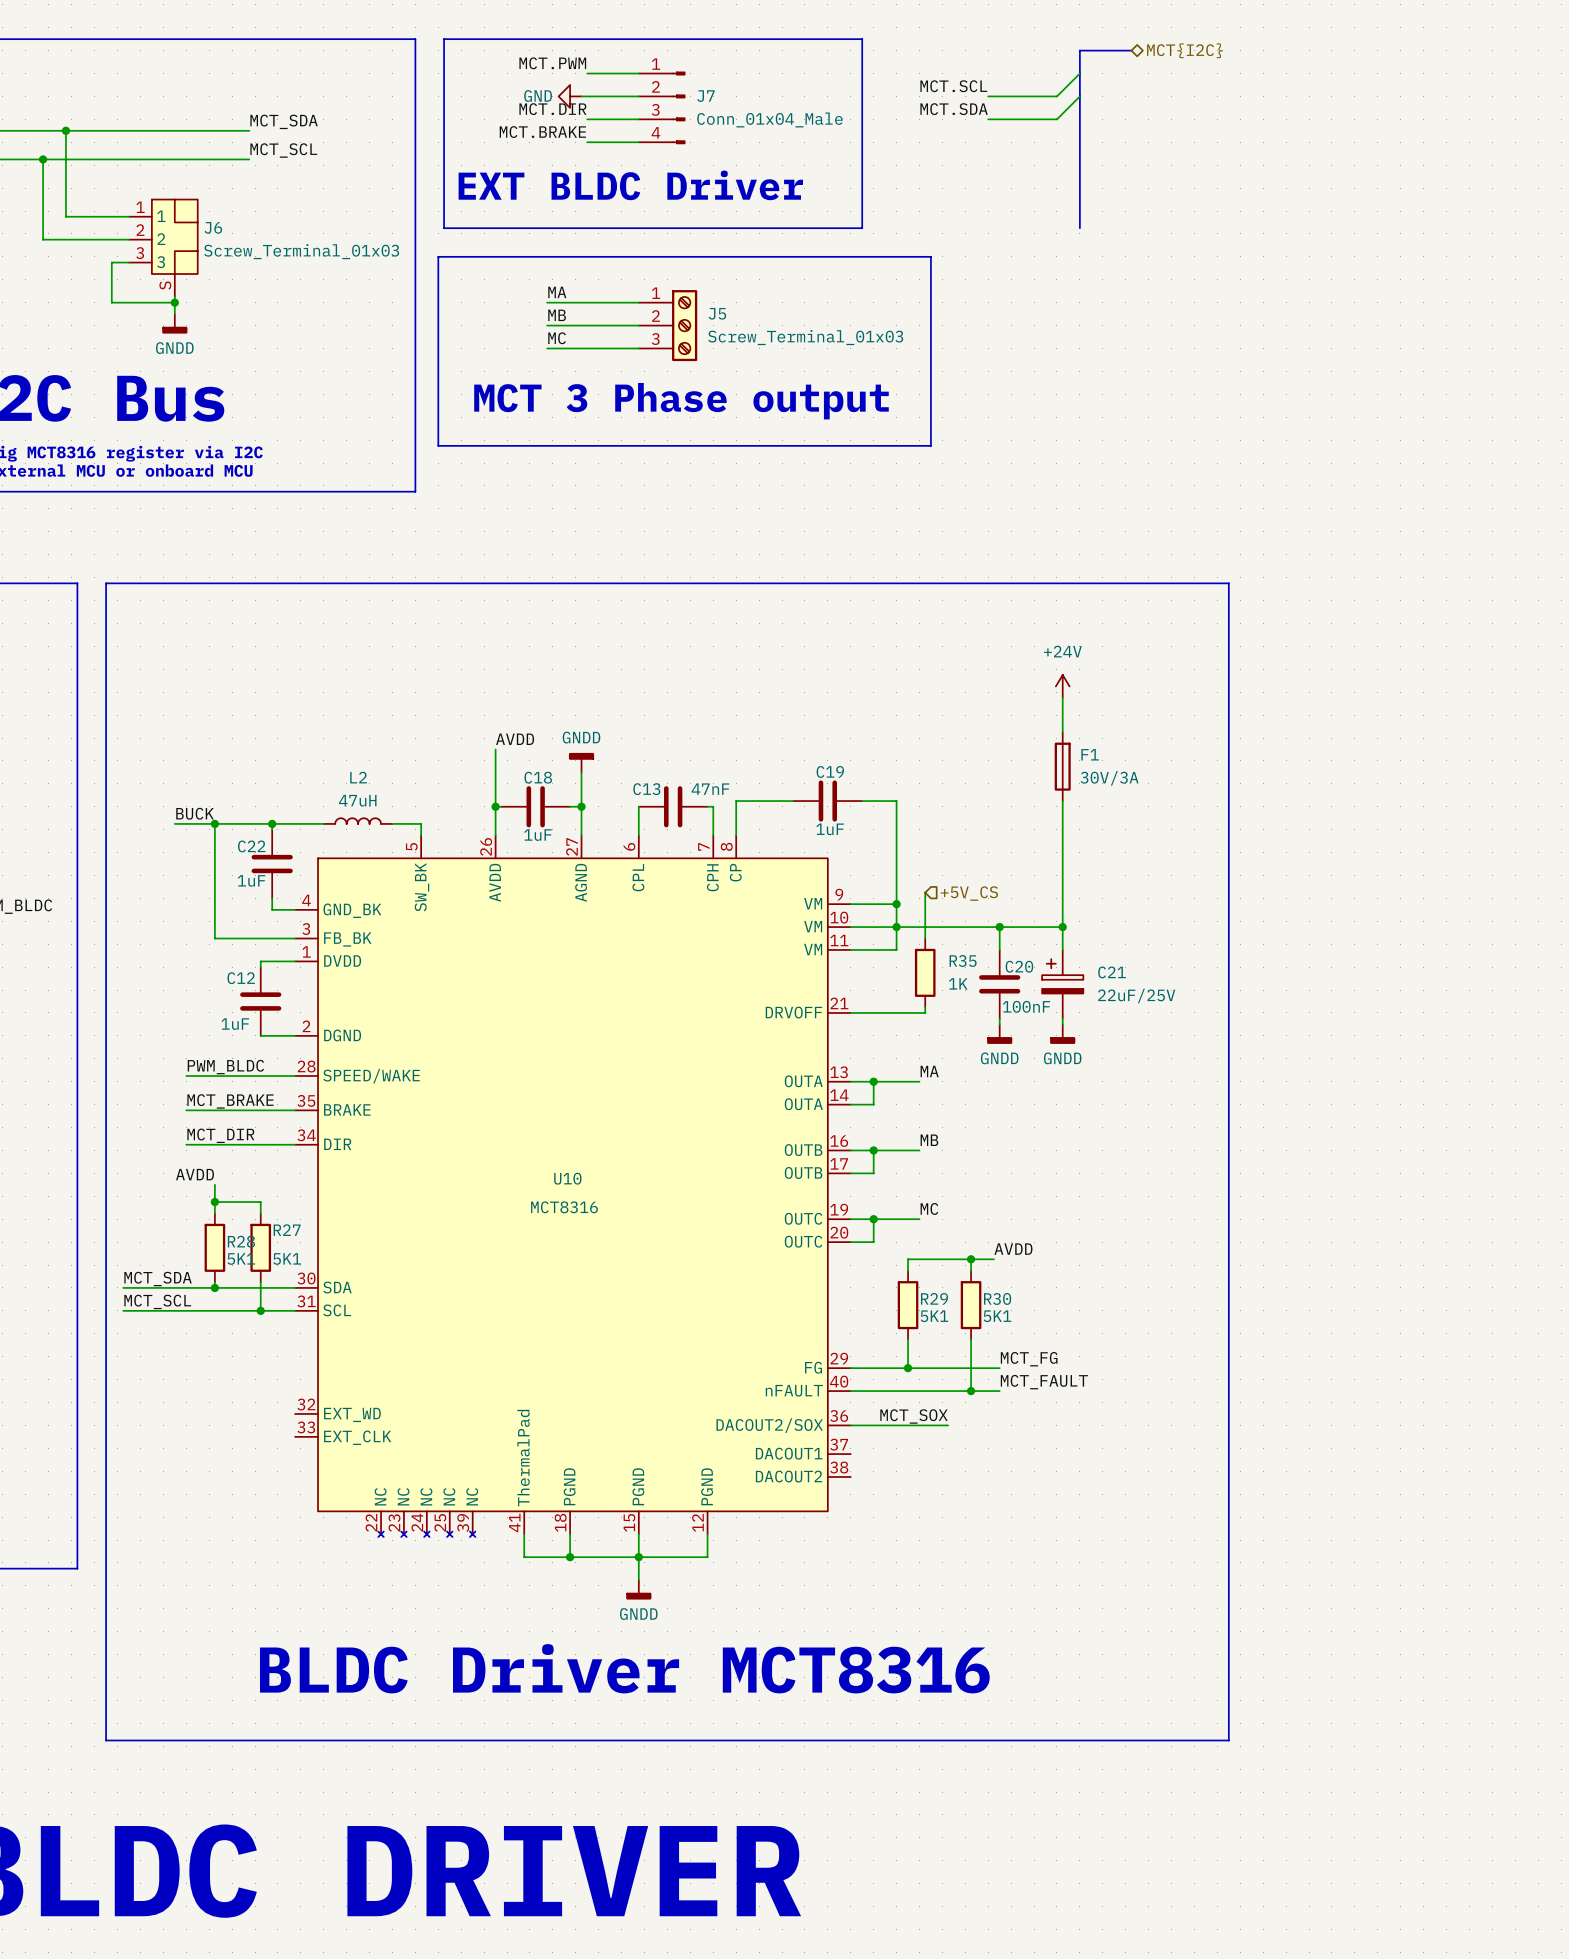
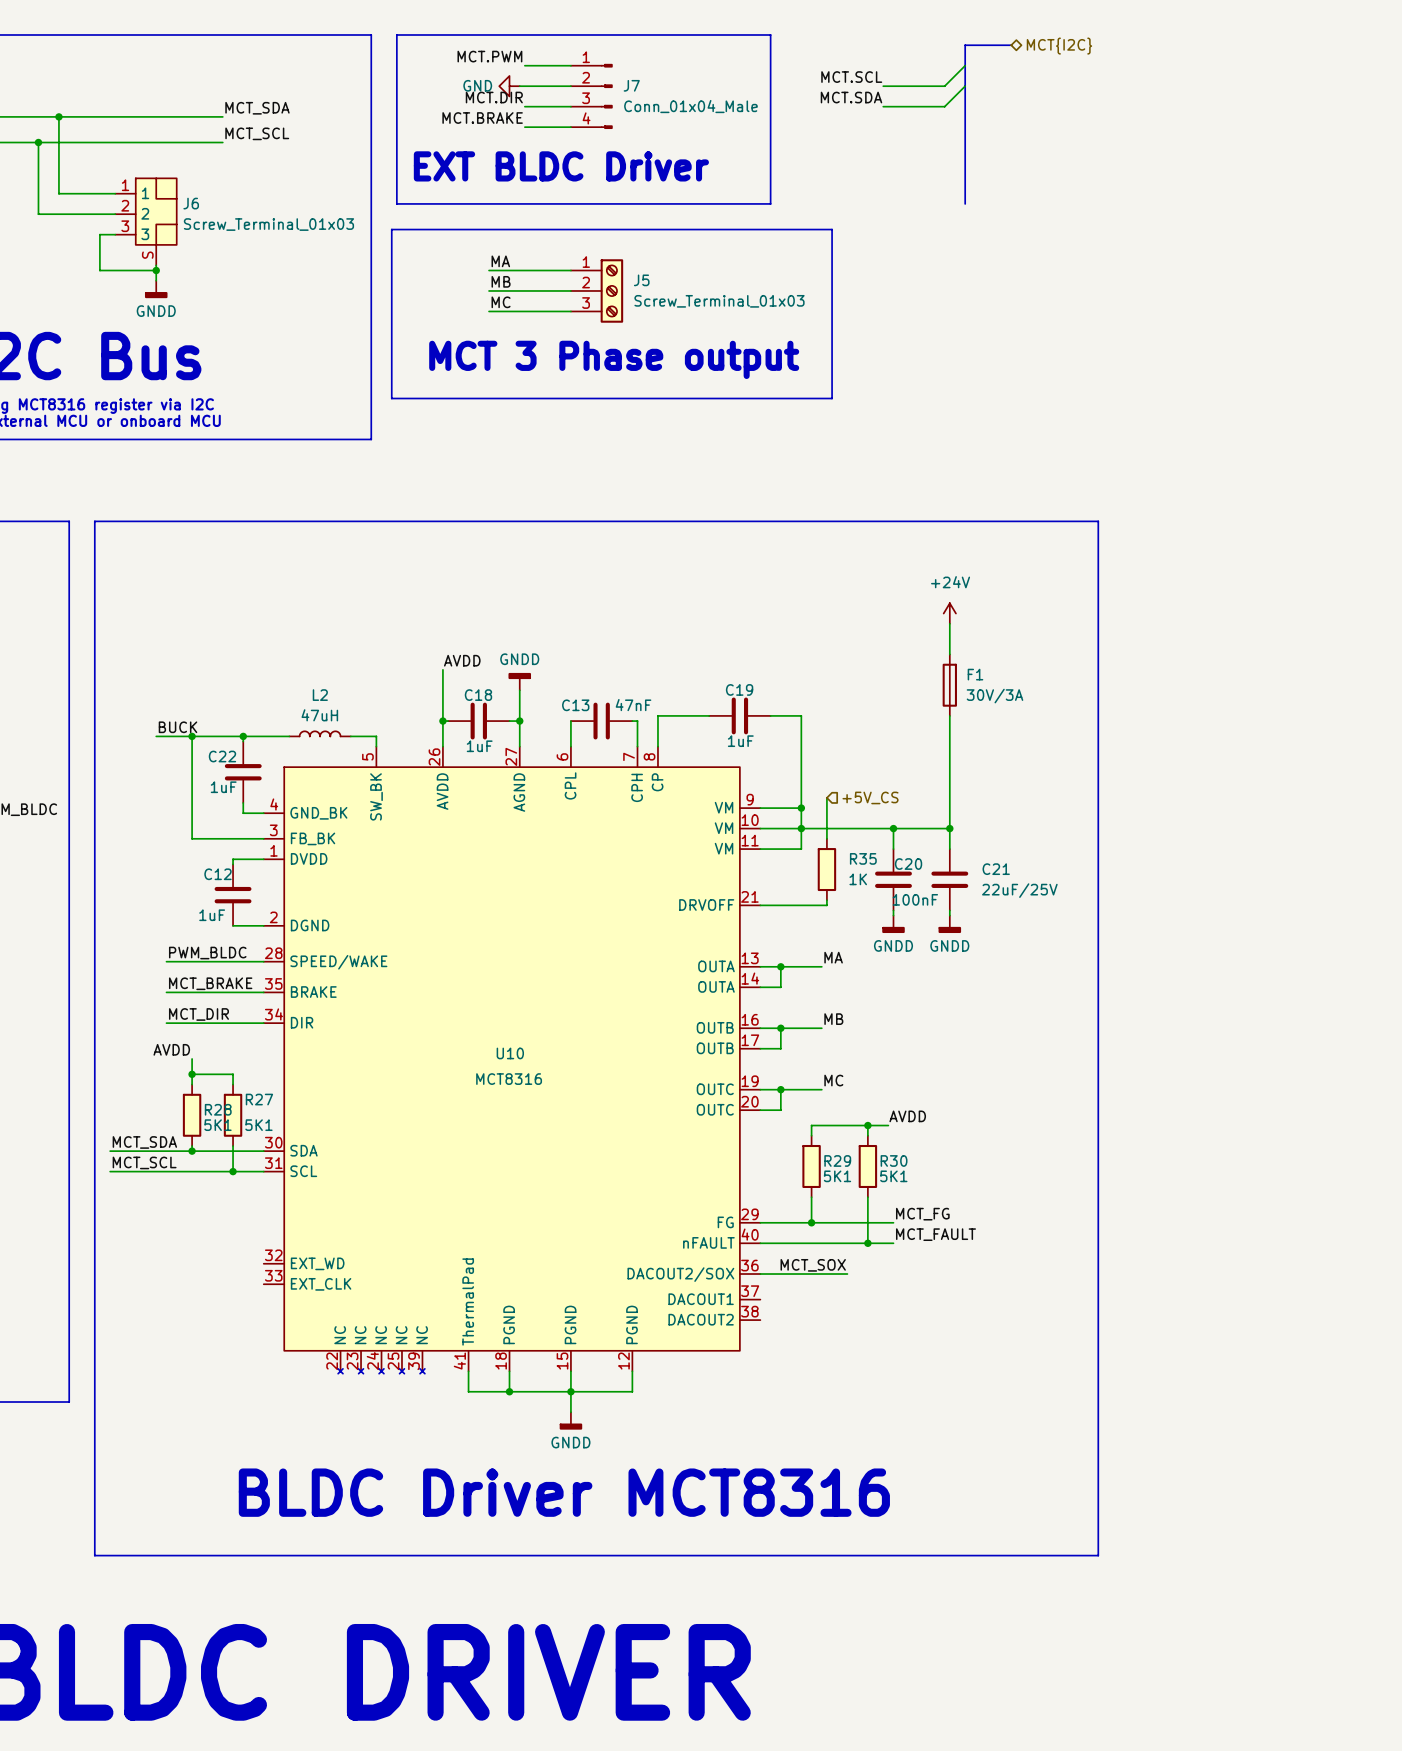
C21 symbol: [1042, 949, 1084, 1019] -> [931, 849, 969, 911]

